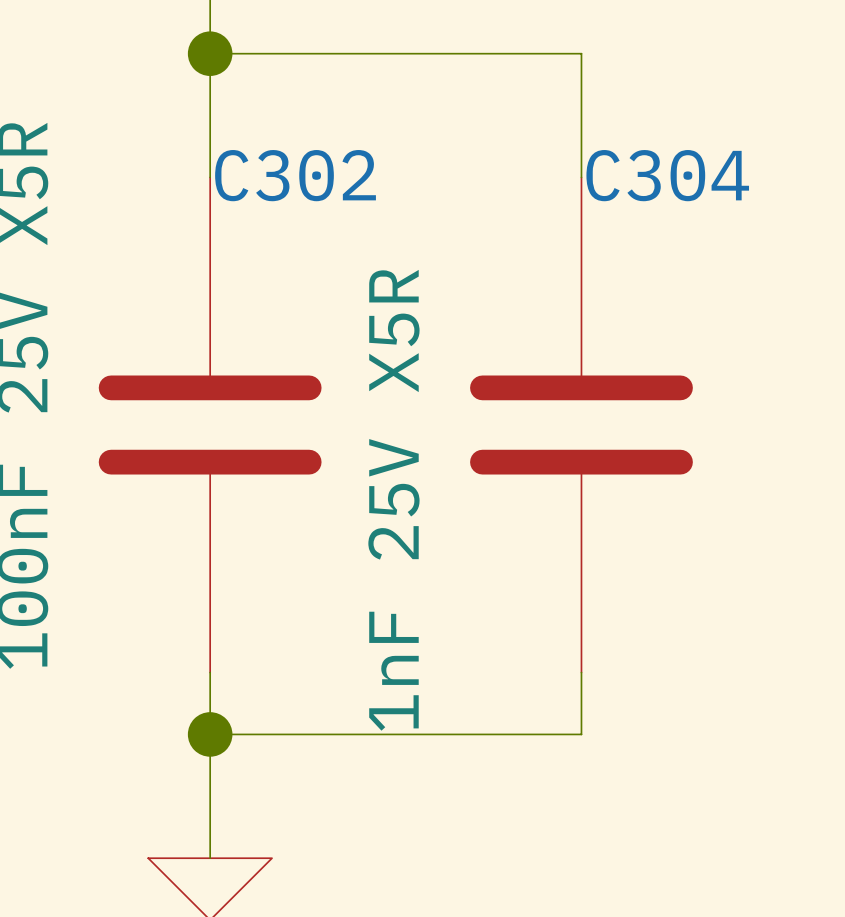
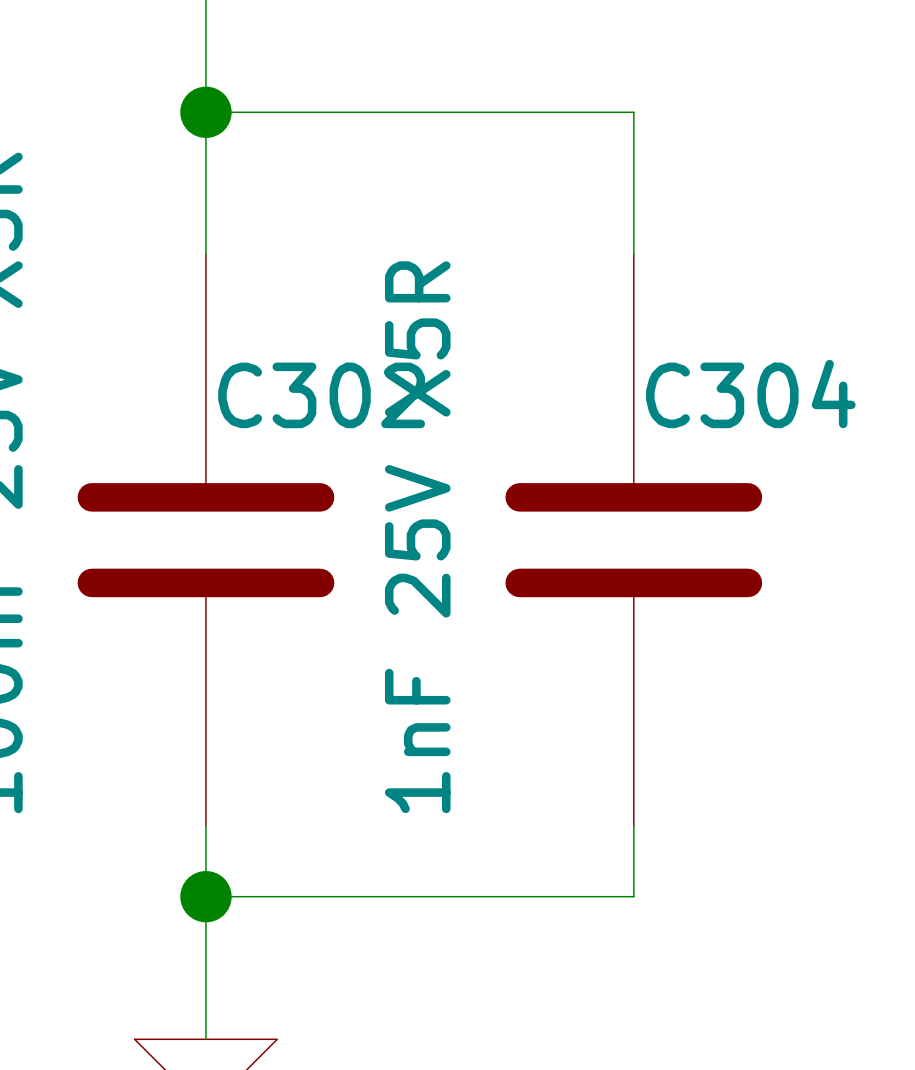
C302 name position: C302 (295, 175) -> C302 (321, 395)
C304 name position: C304 (667, 175) -> C304 (750, 394)
C304 value position: 1nF 25V X5R (393, 500) -> 1nF 25V X5R (417, 537)

